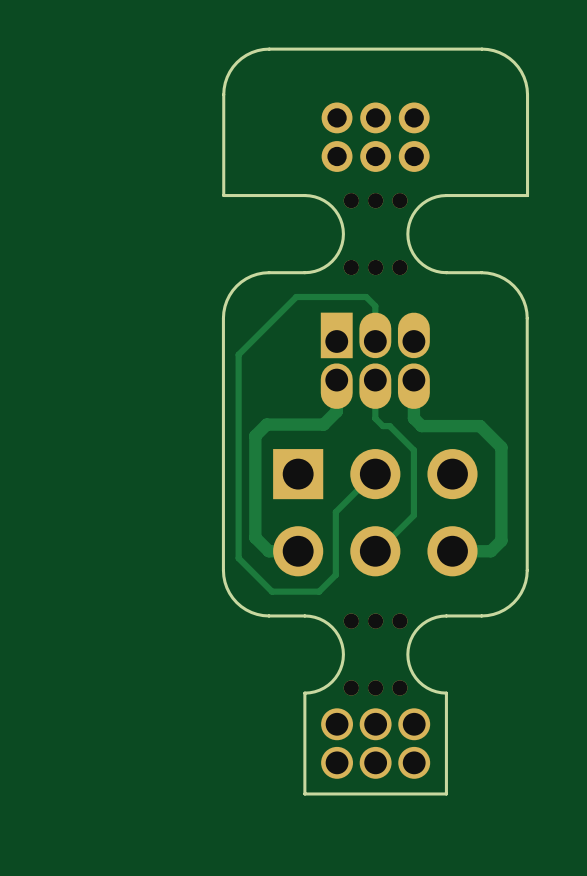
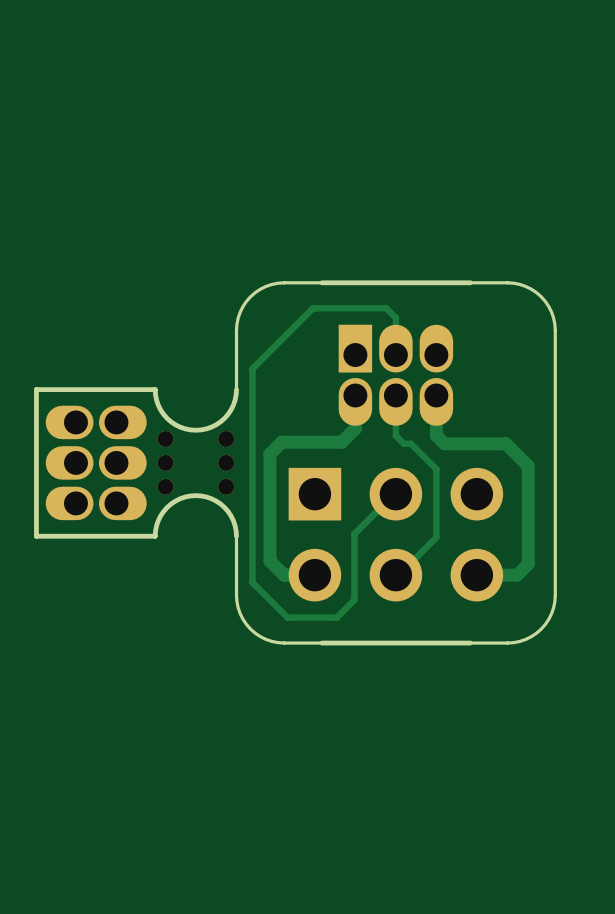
part: (375, 137) -> none
part: (375, 234) -> none
board edge: (446, 272) (436, 271) (422, 264) (410, 248) (408, 229) (413, 214) (419, 206) (427, 200) (441, 195) (527, 195) (525, 82) (521, 71) (514, 62) (504, 55) (493, 50) (269, 49) (251, 52) (241, 58) (233, 66) (227, 77) (224, 88) (223, 195) (314, 196) (328, 203) (340, 219) (343, 239) (338, 253) (324, 267) (304, 272) -> (470, 282) (321, 282)
board edge: none -> (236, 389) (233, 405) (224, 418) (211, 427) (195, 430) (180, 427) (167, 418) (158, 405) (155, 389) (36, 389) (36, 536) (155, 536) (158, 520) (167, 507) (180, 498) (195, 495) (211, 498) (224, 507) (233, 520) (236, 536)
board edge: (223, 375) (223, 512) -> none
part: none -> (96, 462)
part: none -> (195, 462)
board edge: (446, 615) (431, 618) (419, 627) (410, 639) (407, 654) (410, 669) (419, 681) (431, 690) (446, 693) (446, 793) (304, 793) (304, 693) (319, 690) (332, 681) (340, 669) (343, 654) (340, 639) (332, 627) (319, 618) (304, 615) -> (470, 643) (321, 643)
part: (375, 654) -> none
part: (375, 743) -> none

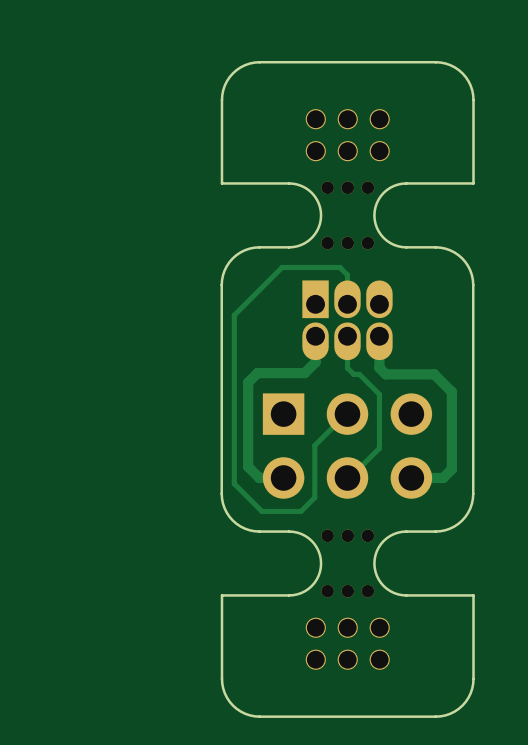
part: none -> (347, 135)
part: none -> (347, 215)
board edge: (470, 282) (321, 282) -> (406, 247) (398, 246) (386, 240) (376, 227) (374, 211) (378, 199) (383, 192) (390, 187) (402, 183) (473, 183) (472, 90) (462, 73) (445, 63) (259, 62) (245, 65) (229, 76) (222, 95) (221, 183) (297, 184) (308, 190) (318, 203) (320, 219) (316, 231) (305, 243) (289, 247)
board edge: (236, 389) (233, 405) (224, 418) (211, 427) (195, 430) (180, 427) (167, 418) (158, 405) (155, 389) (36, 389) (36, 536) (155, 536) (158, 520) (167, 507) (180, 498) (195, 495) (211, 498) (224, 507) (233, 520) (236, 536) -> none
board edge: none -> (221, 332) (221, 446)
part: (96, 462) -> none
part: (195, 462) -> none
board edge: (470, 643) (321, 643) -> (406, 531) (390, 535) (381, 544) (376, 551) (374, 567) (378, 579) (383, 586) (390, 591) (402, 595) (473, 595) (472, 688) (462, 705) (445, 715) (259, 716) (245, 713) (229, 701) (222, 683) (221, 595) (297, 594) (308, 588) (318, 575) (320, 559) (316, 547) (305, 535) (289, 531)
part: none -> (347, 563)
part: none -> (347, 643)

